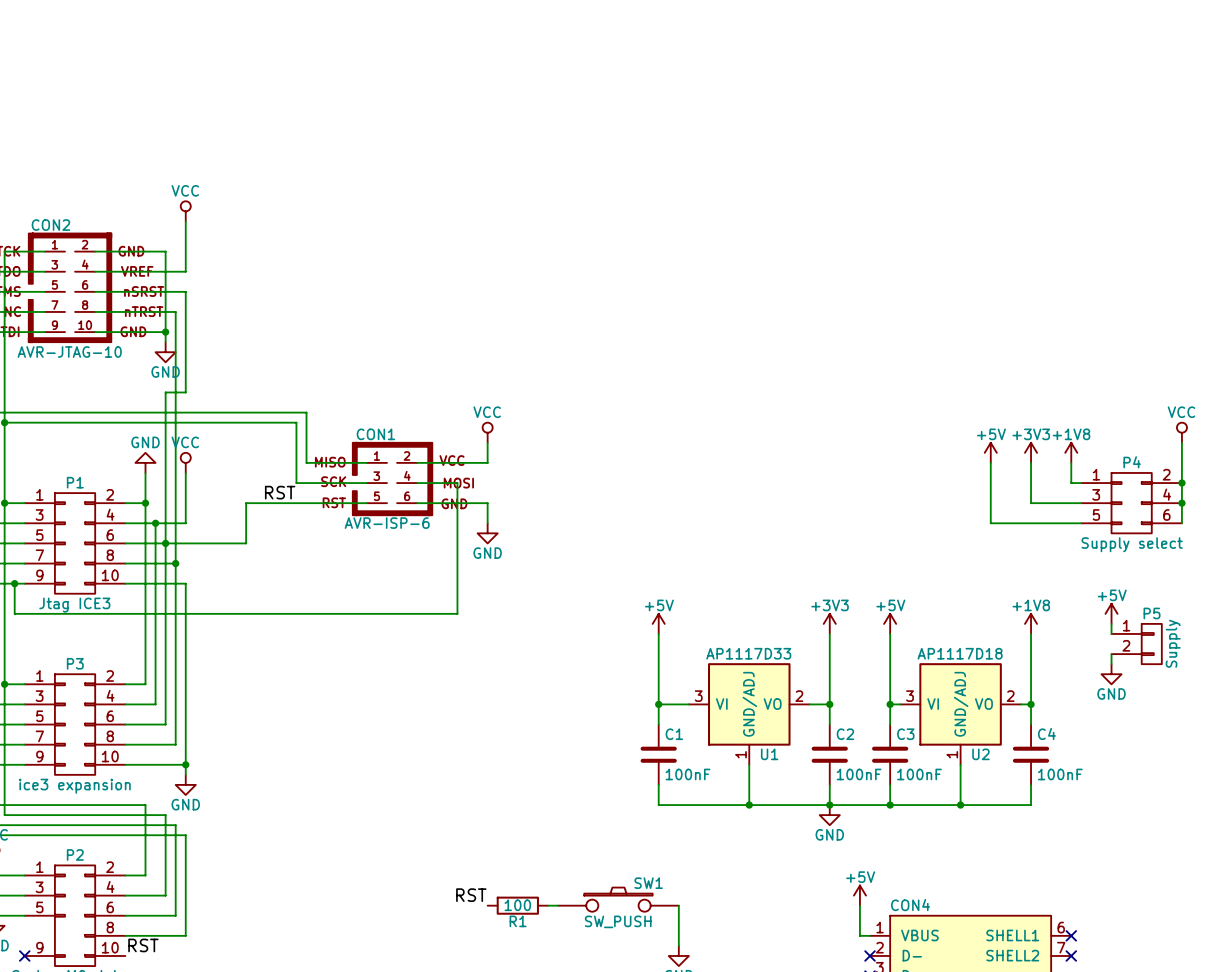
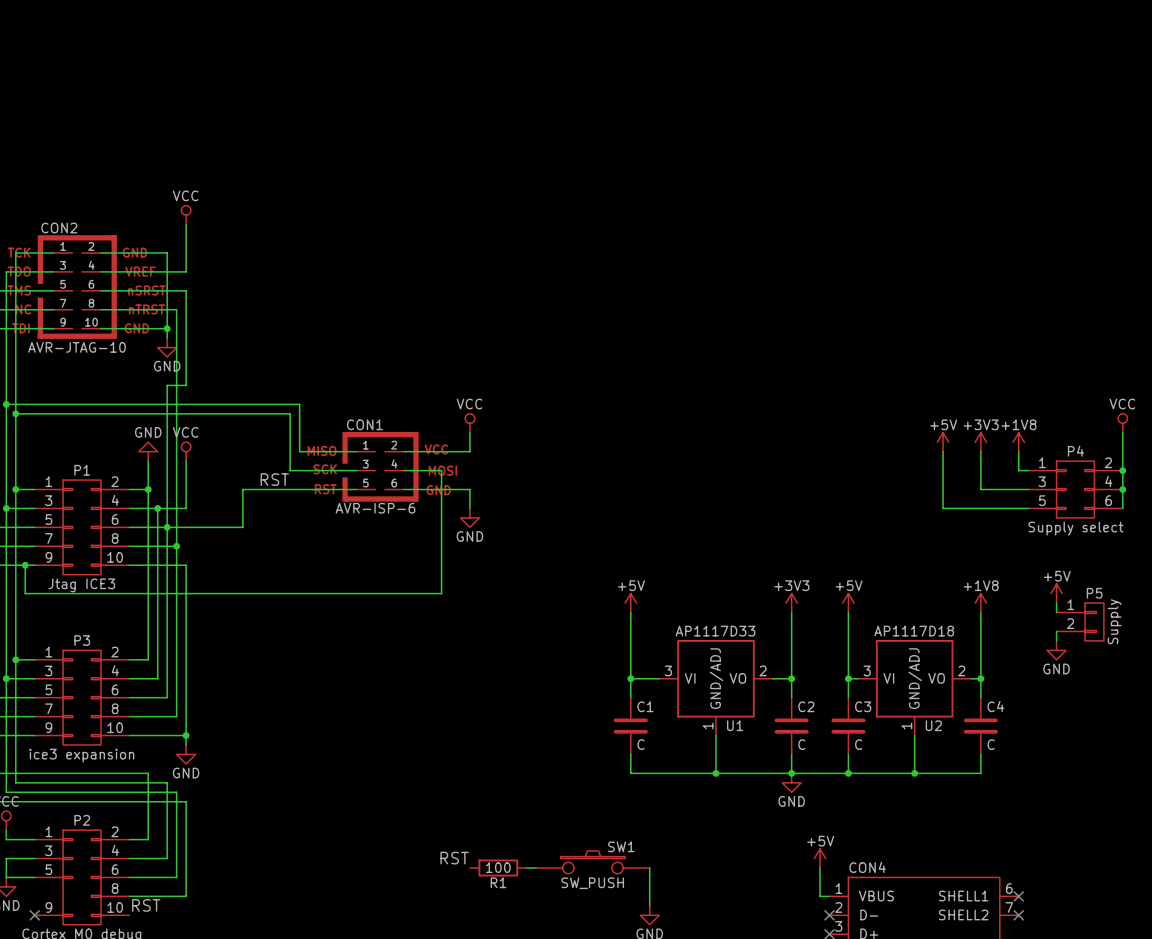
C1 value: 100nF (688, 774) -> C (641, 744)
C2 value: 100nF (859, 774) -> C (801, 744)
C3 value: 100nF (919, 774) -> C (858, 744)
C4 value: 100nF (1060, 774) -> C (991, 744)

